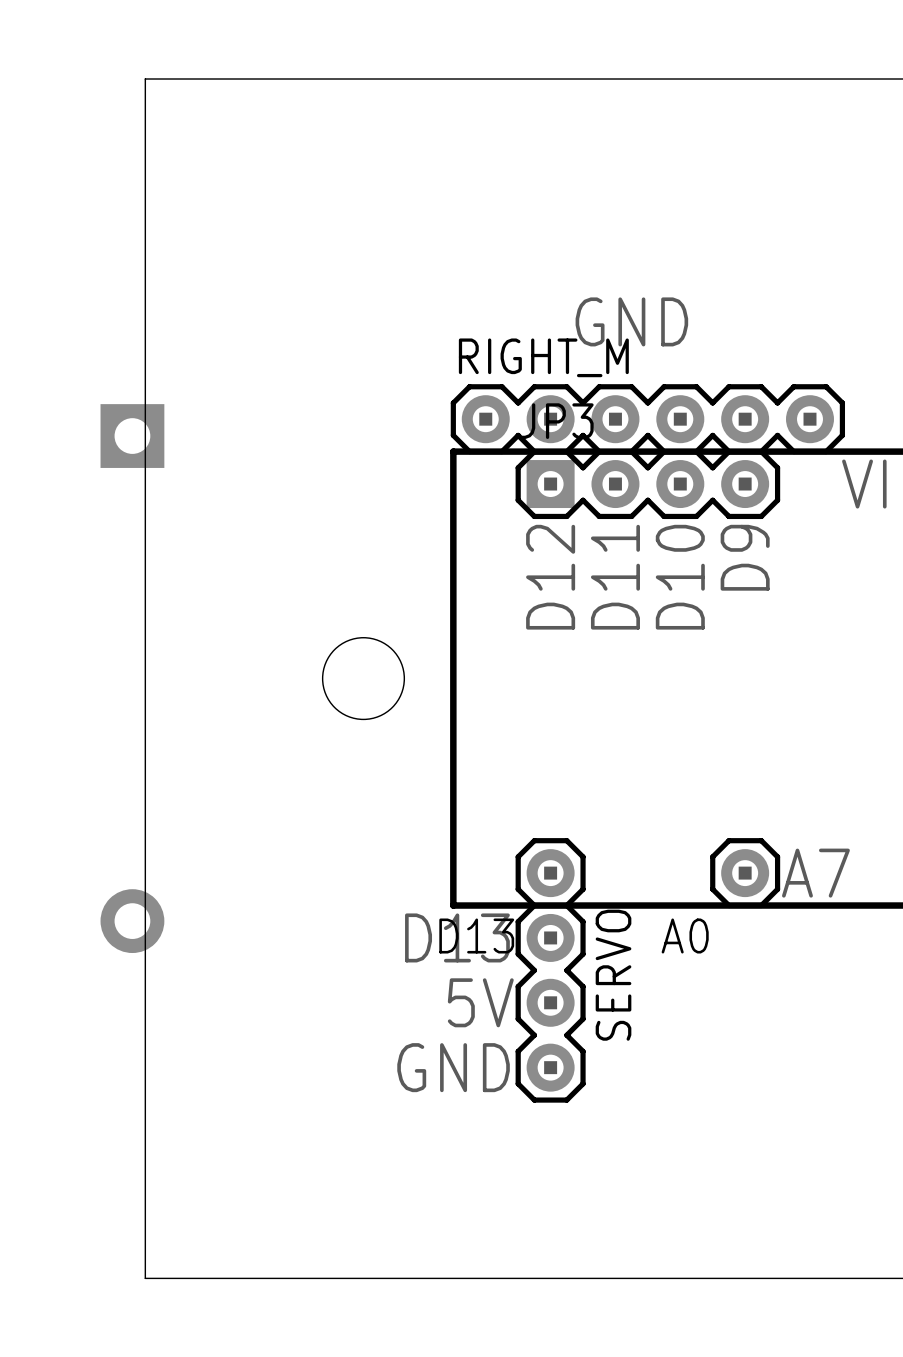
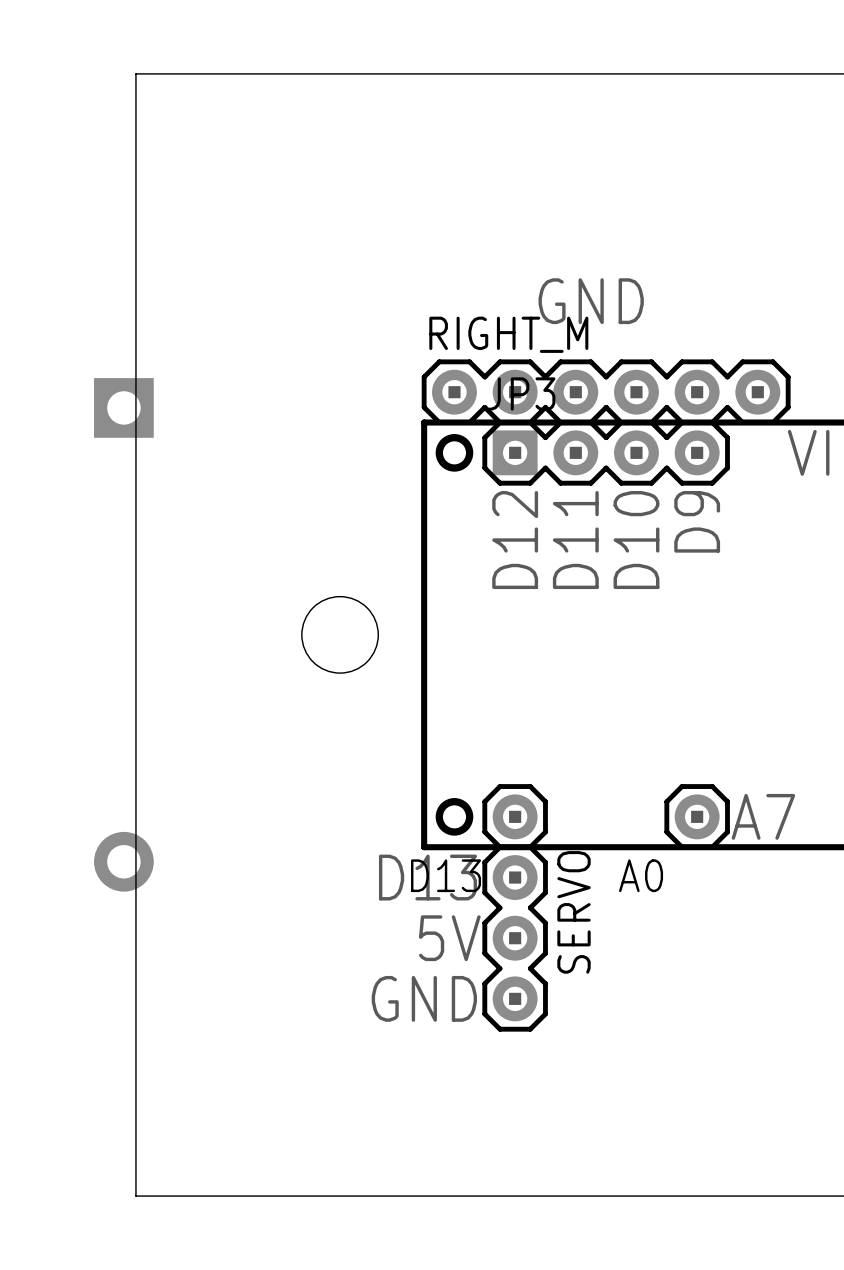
drawing: none -> [435, 434, 474, 472]
drawing: none -> [435, 798, 474, 836]

